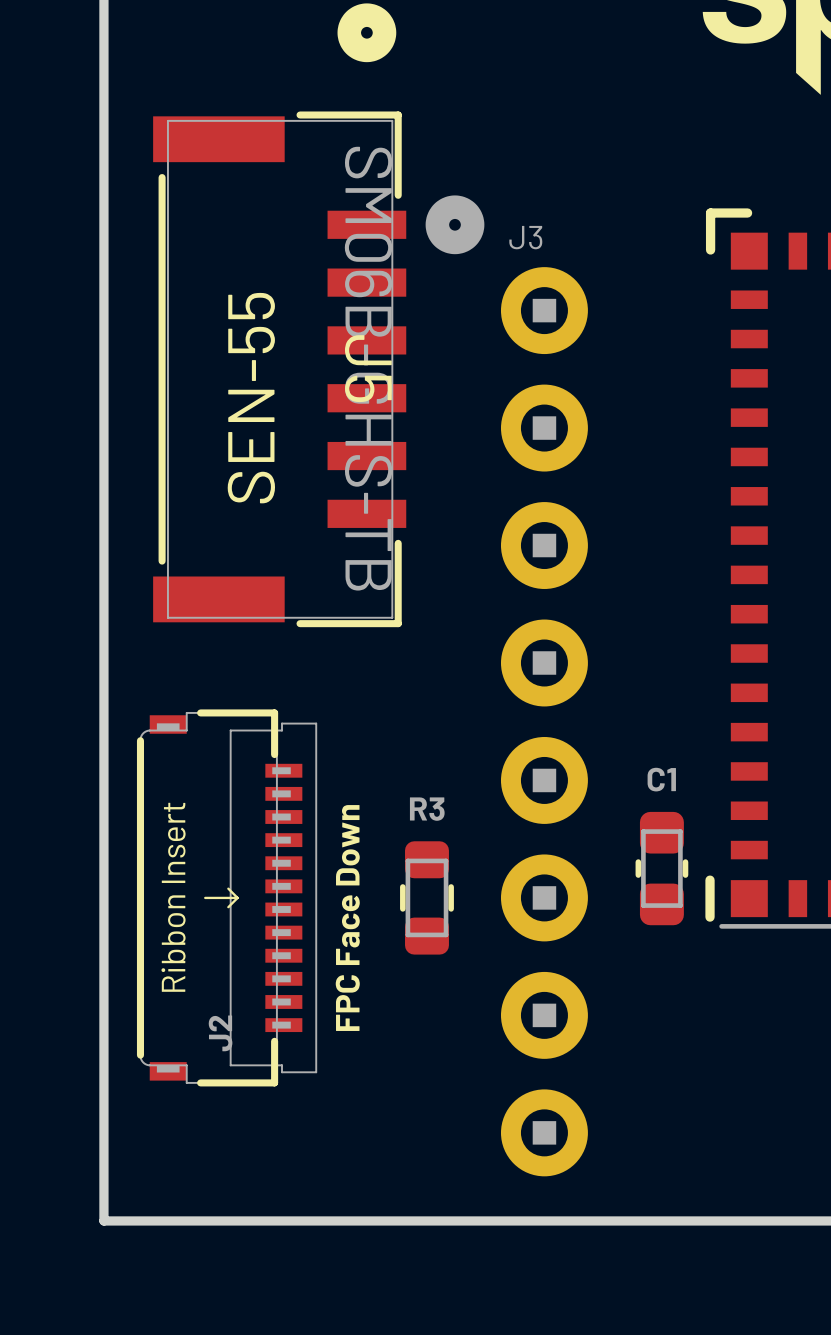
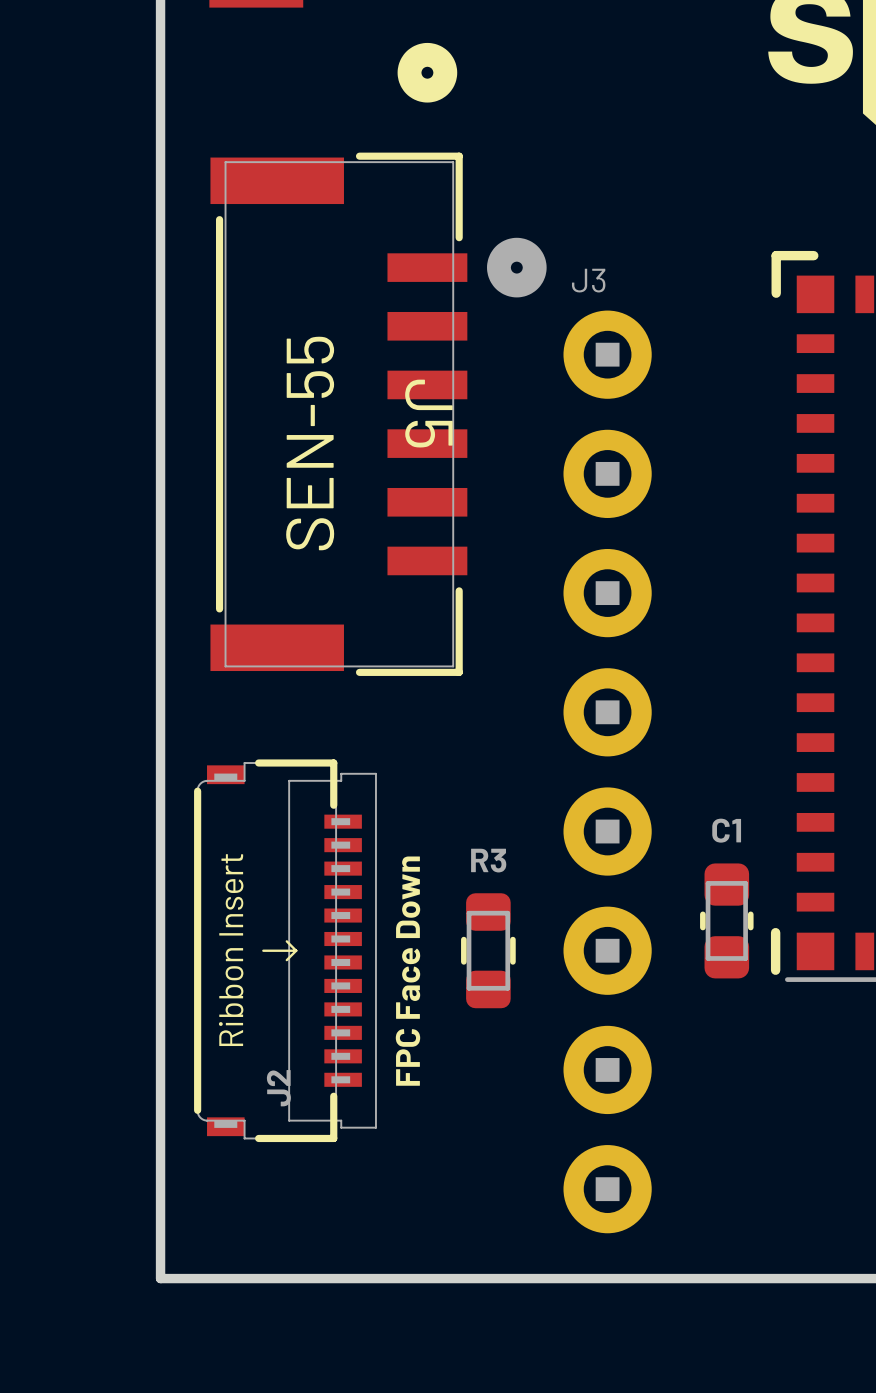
J5 value: SM06B-GHS-TB (368, 368) -> none

